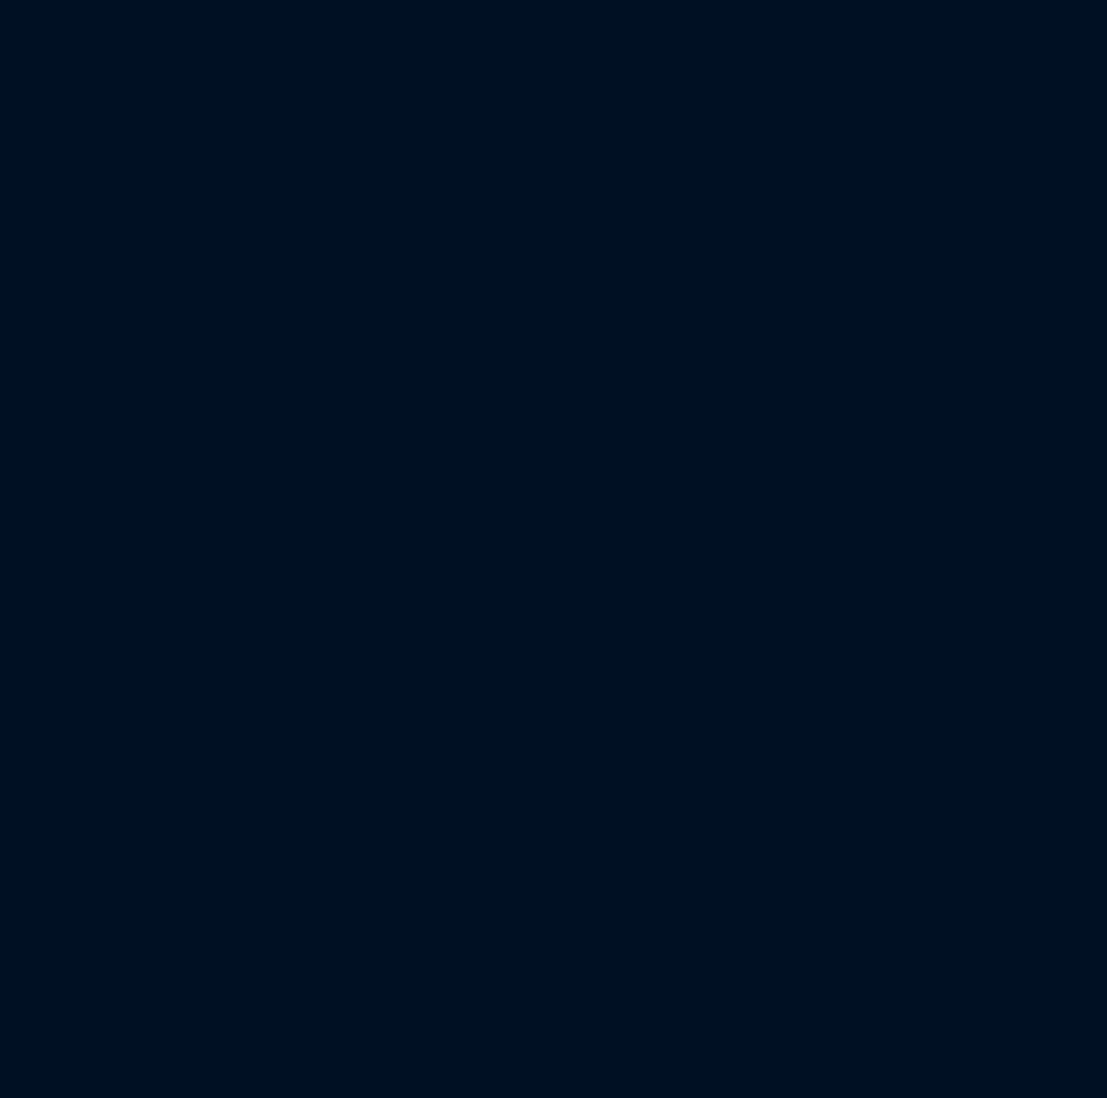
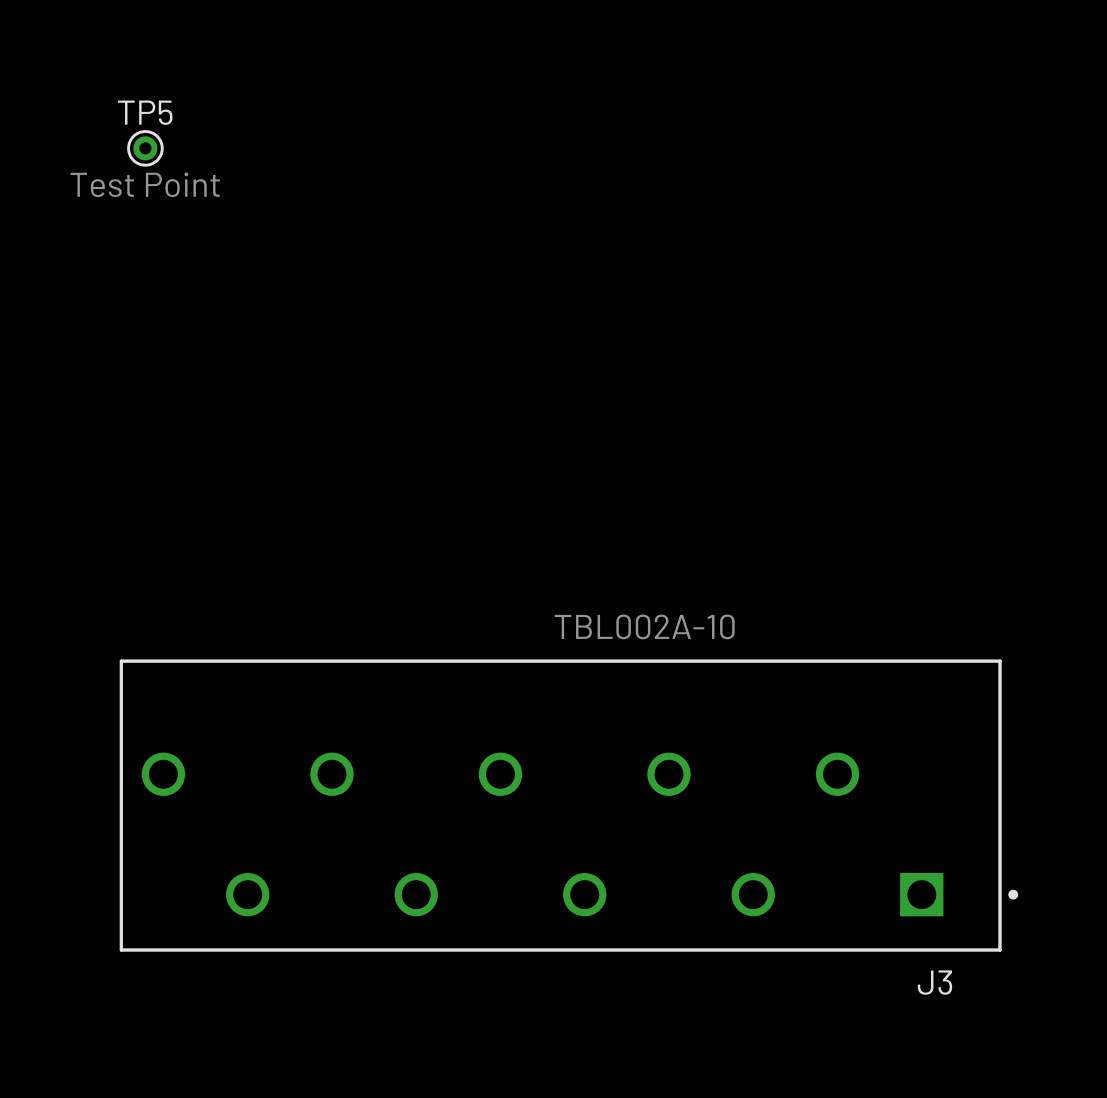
TP5: none -> Test Point (145, 148)
J3: none -> TBL002A-10 (568, 805)

